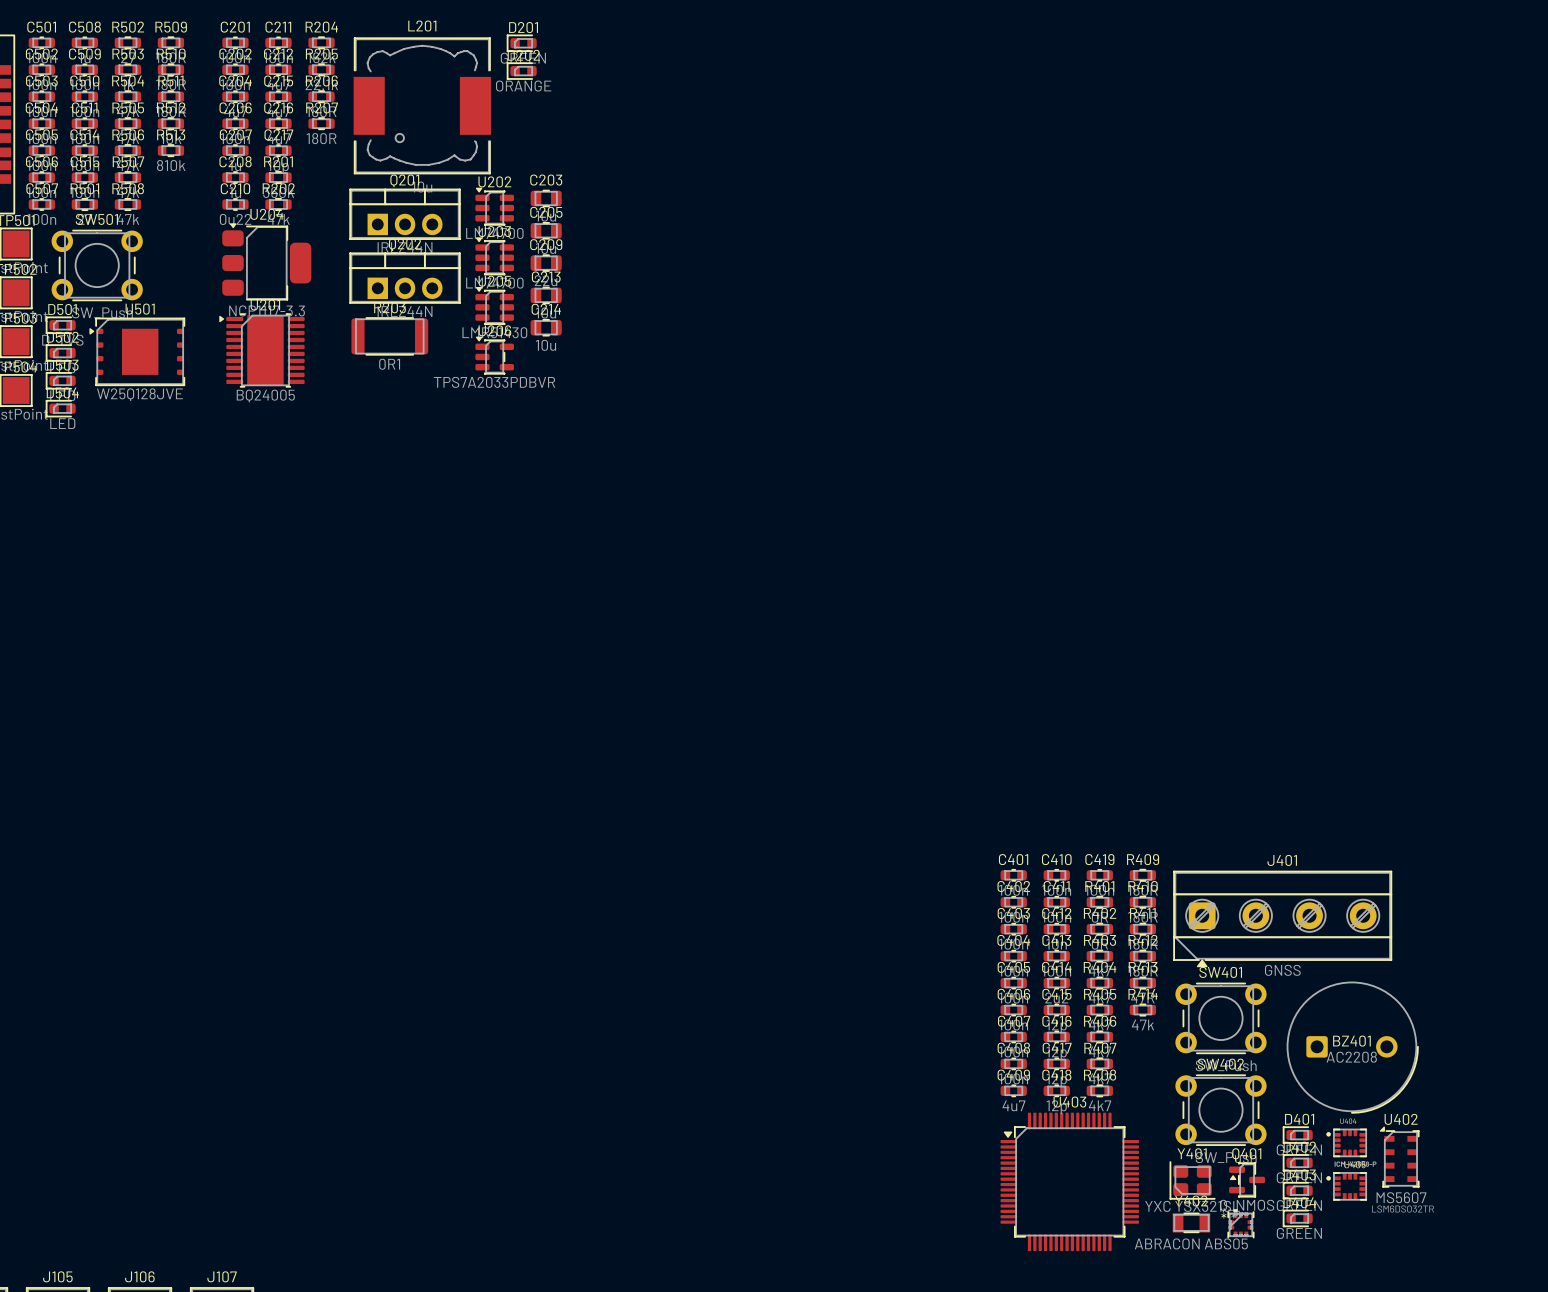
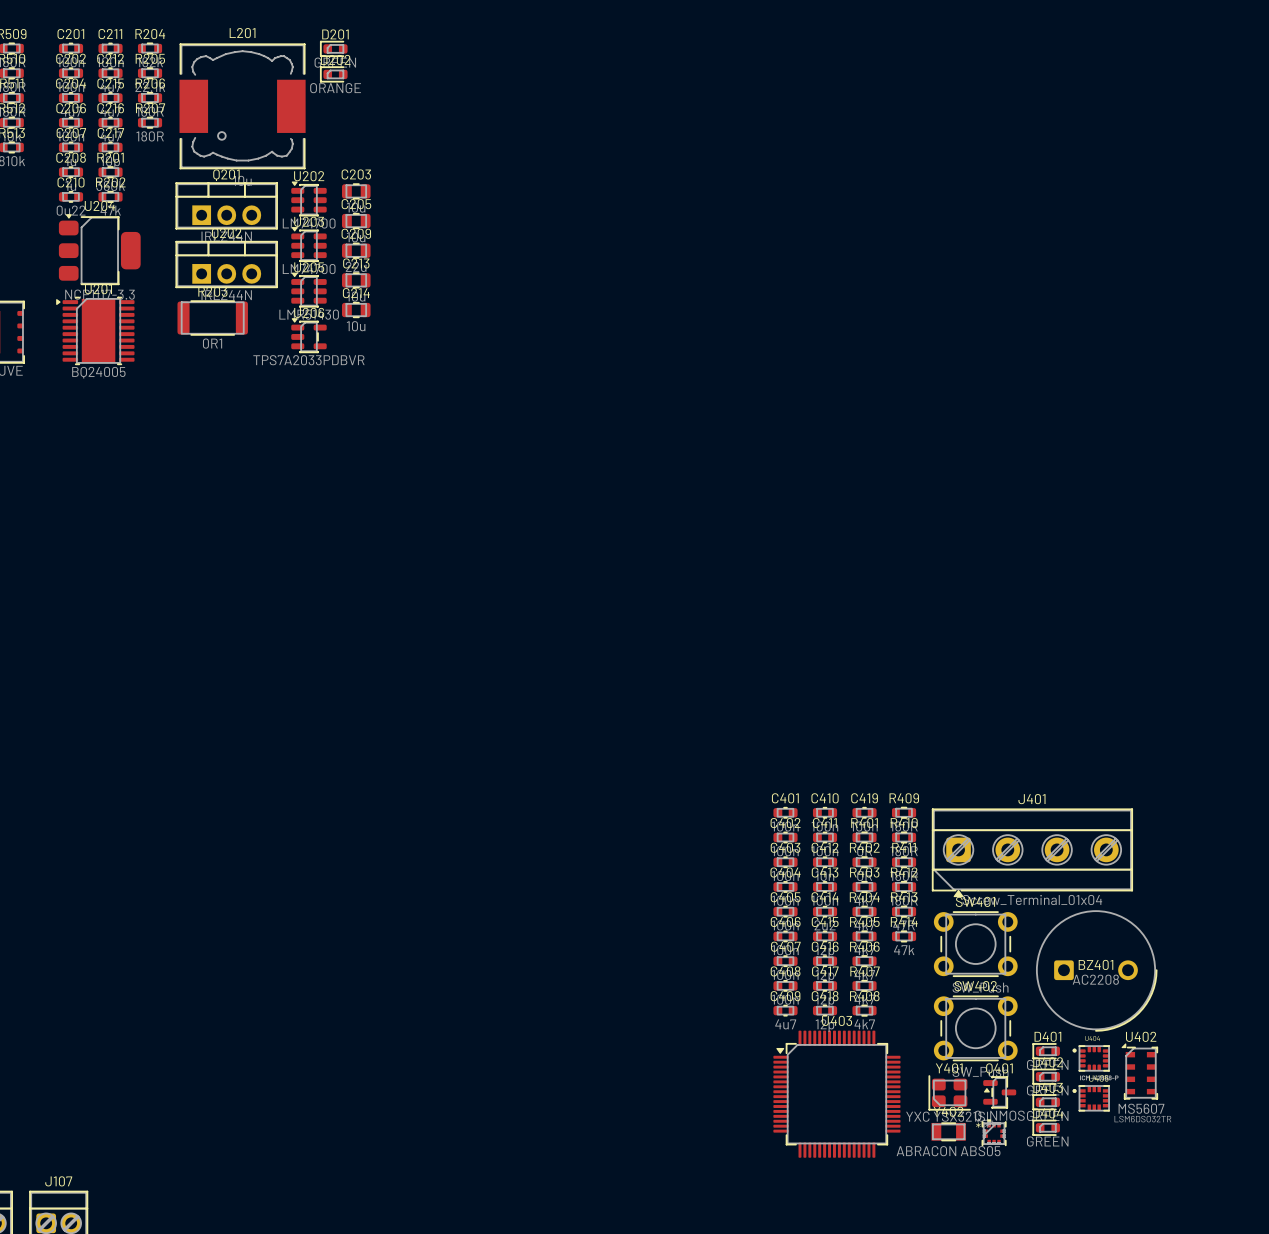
J401 value: GNSS (1282, 970) -> Screw_Terminal_01x04 (1032, 900)

